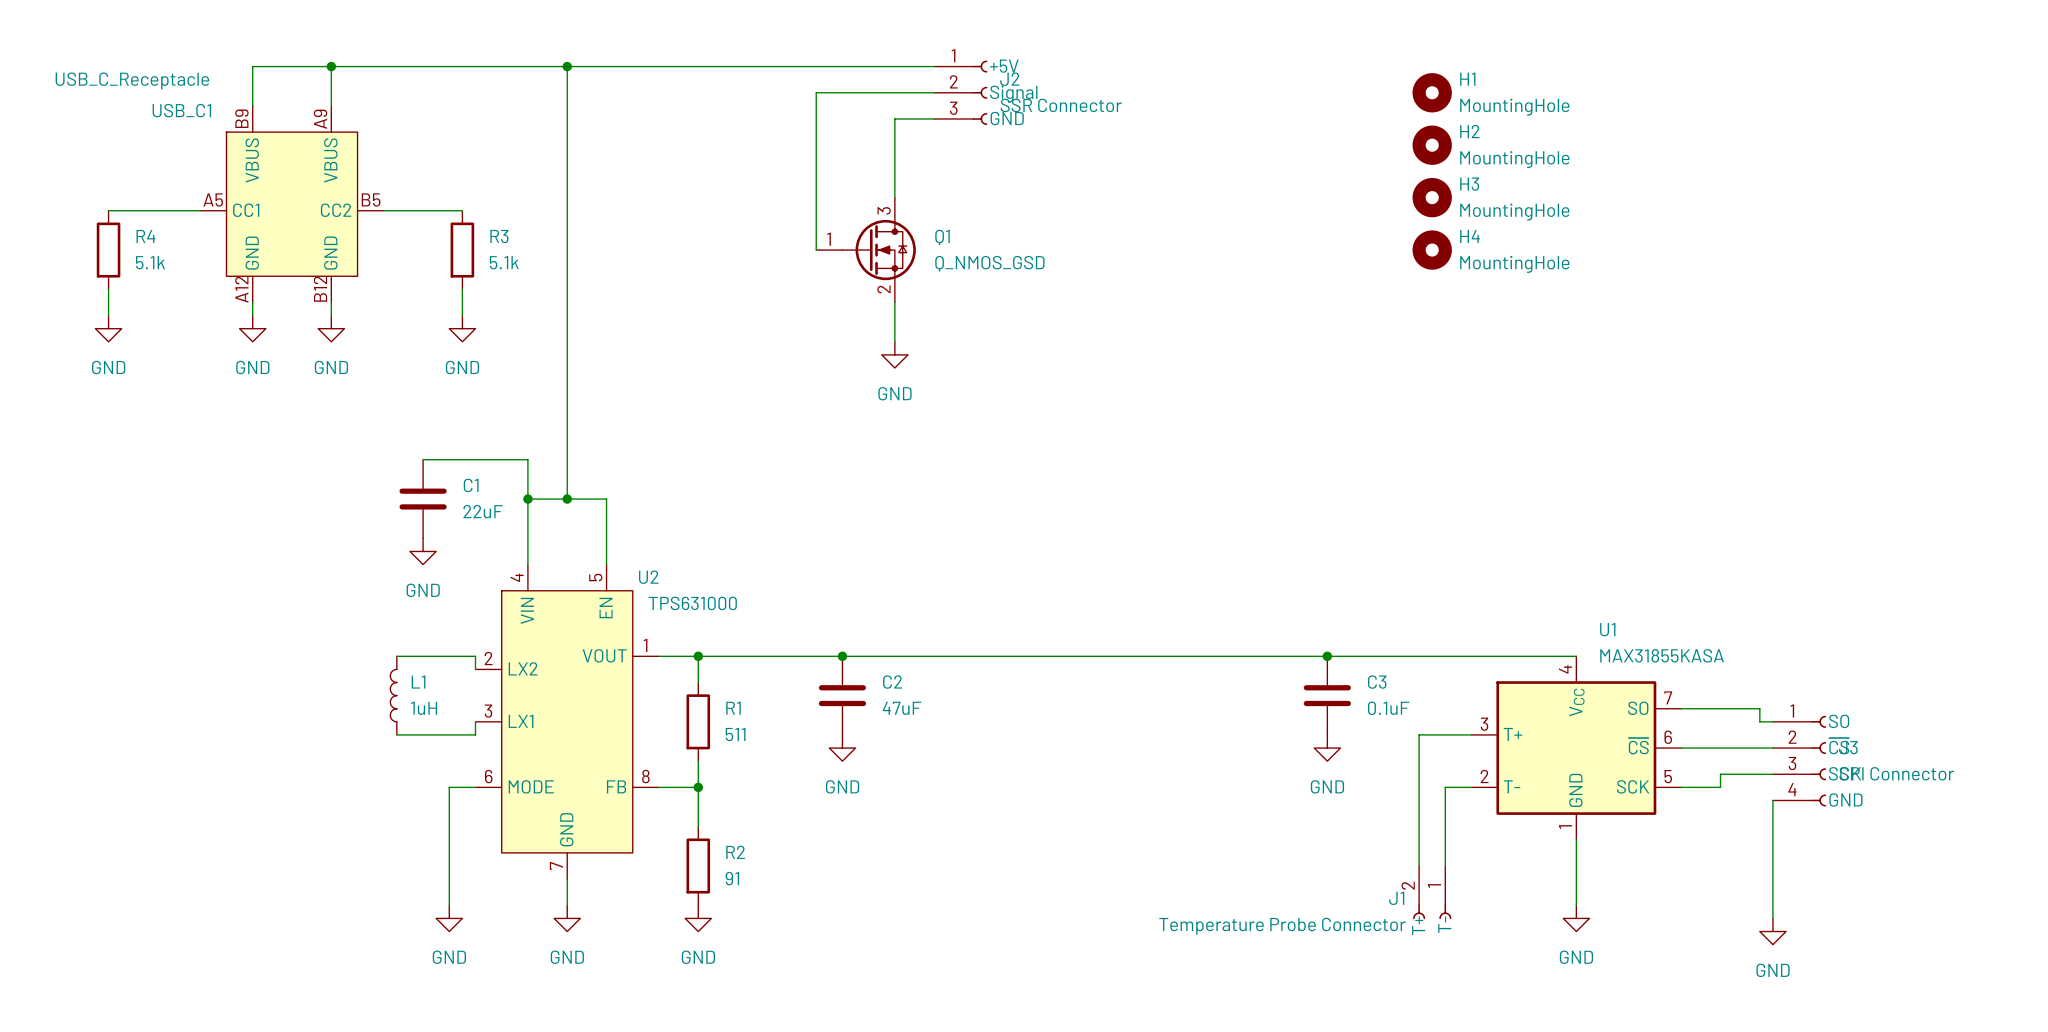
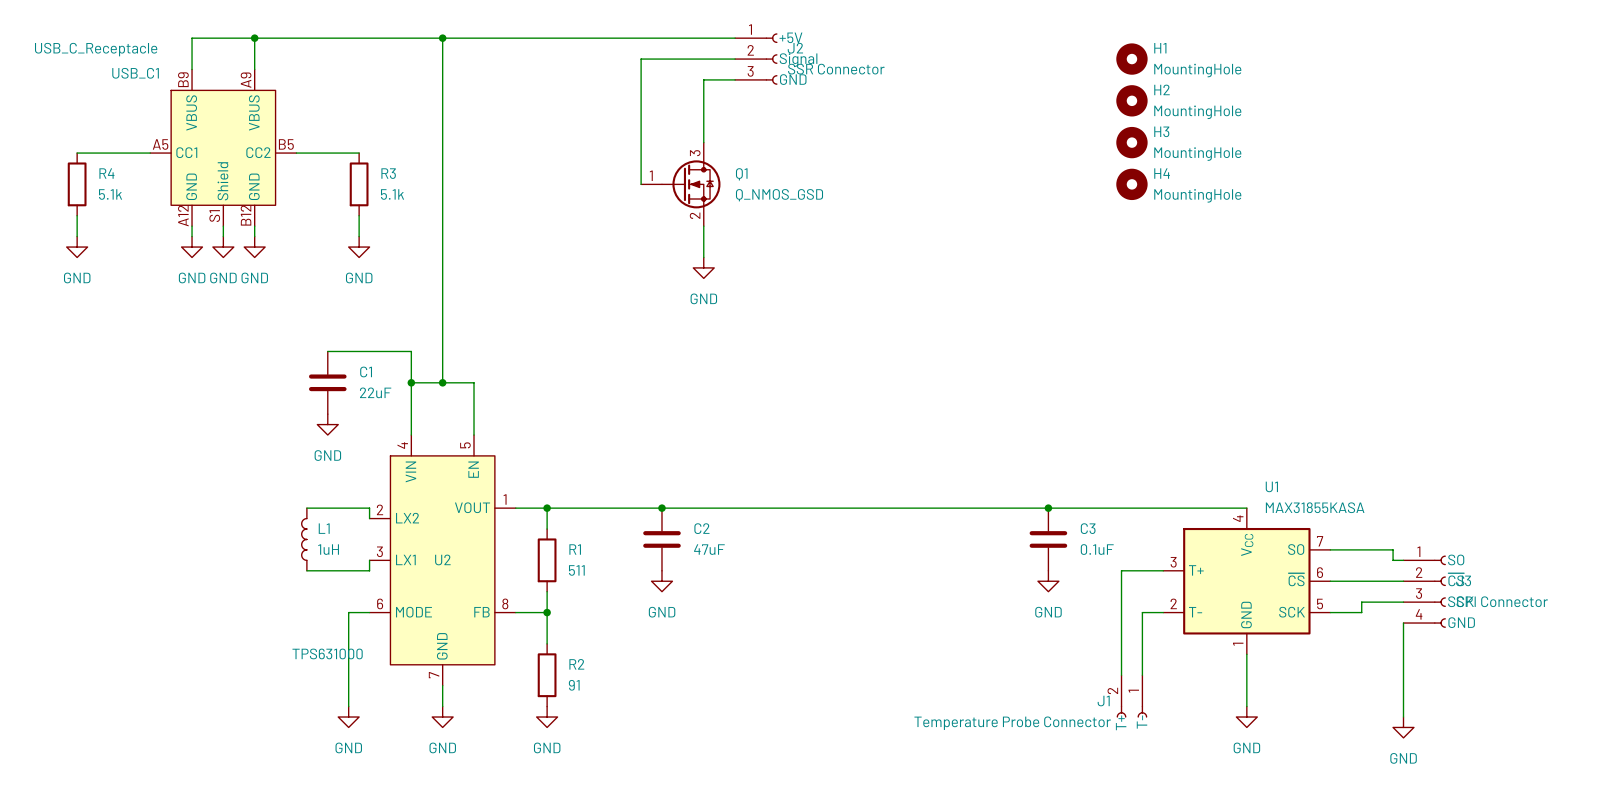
USB_C1 symbol: [200, 105, 384, 303] -> [150, 69, 297, 227]
wire: none -> (223, 226) (223, 236)
power symbol: none -> GND (223, 247)
U2 name position: U2 (648, 577) -> U2 (442, 559)
U2 value position: TPS631000 (692, 603) -> TPS631000 (327, 653)

